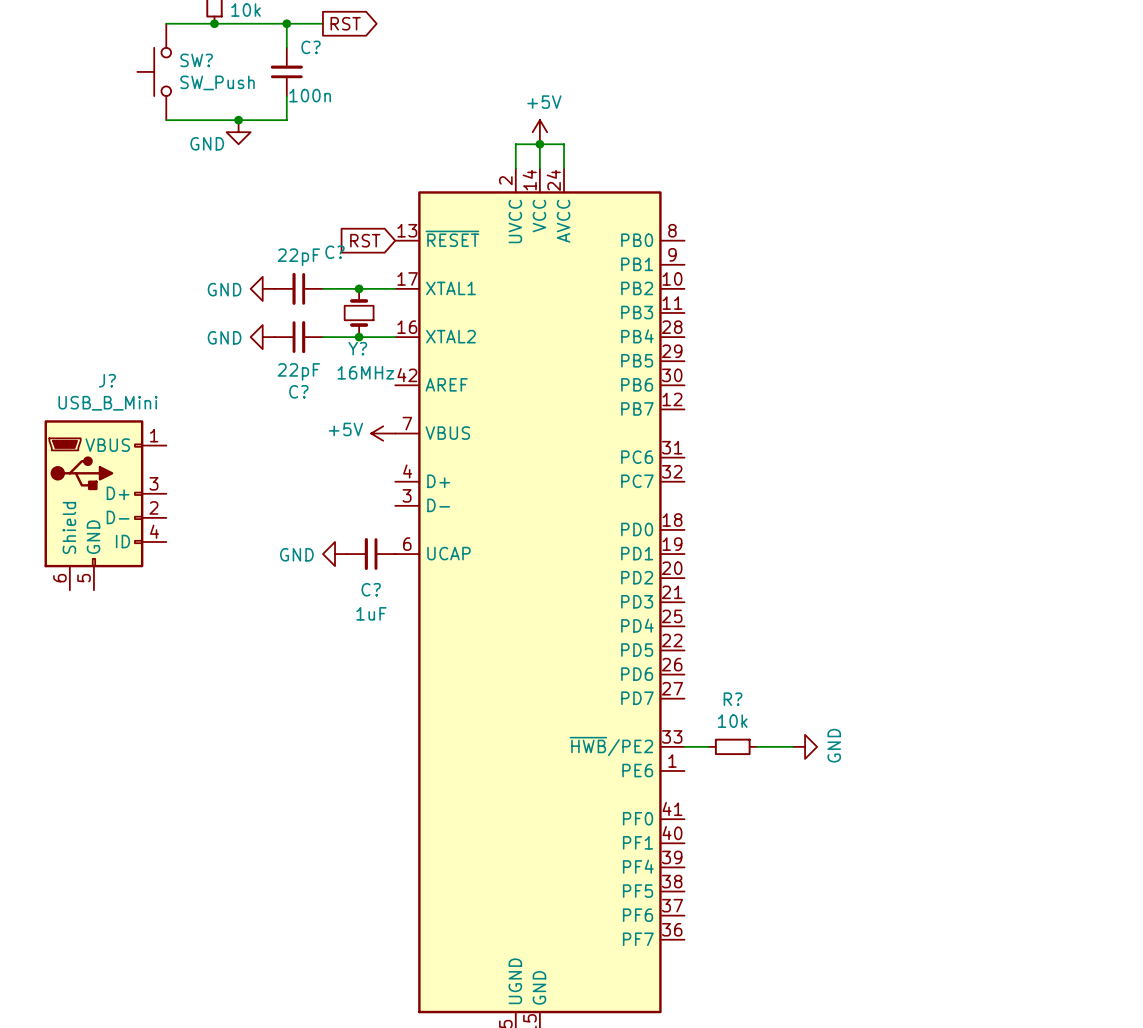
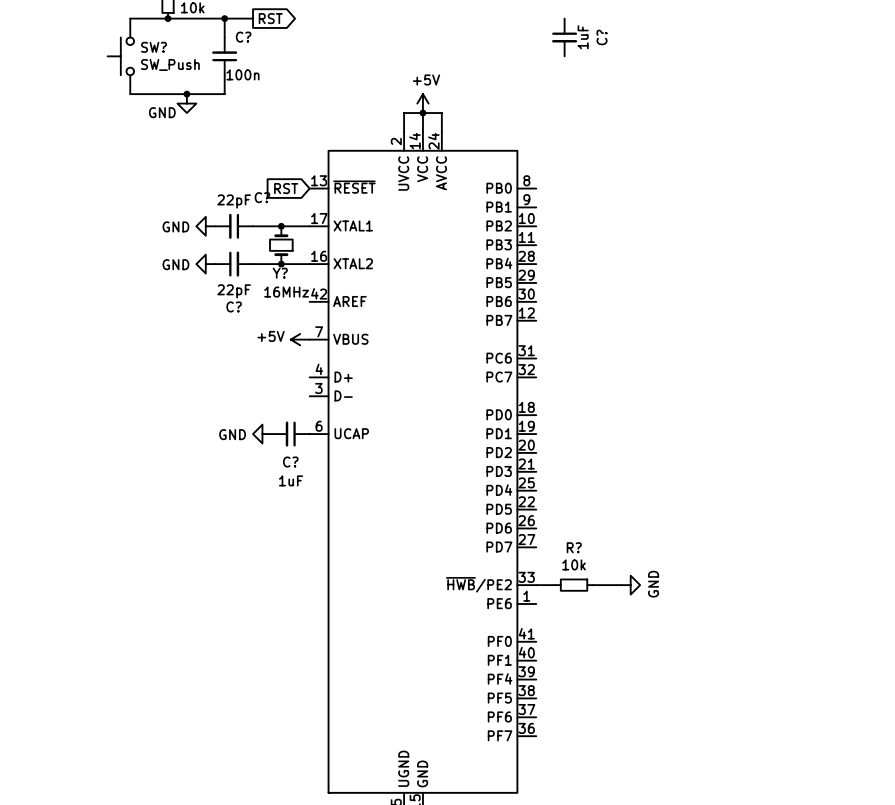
C?: none -> 1uF (564, 37)
J?: USB_B_Mini (105, 505) -> none

